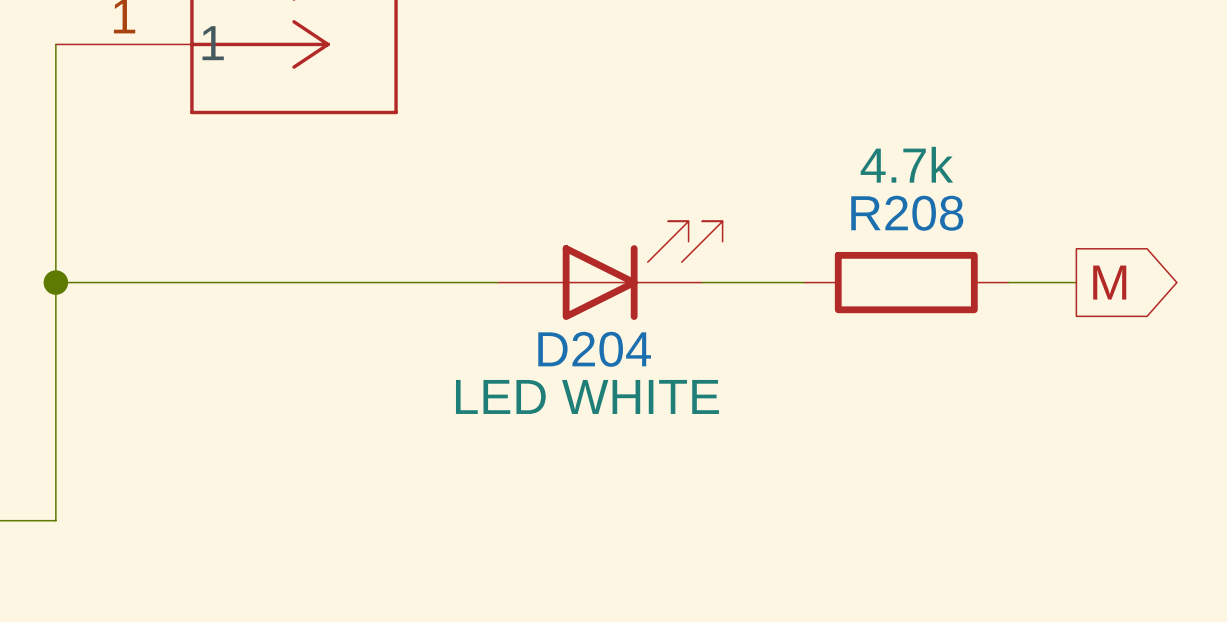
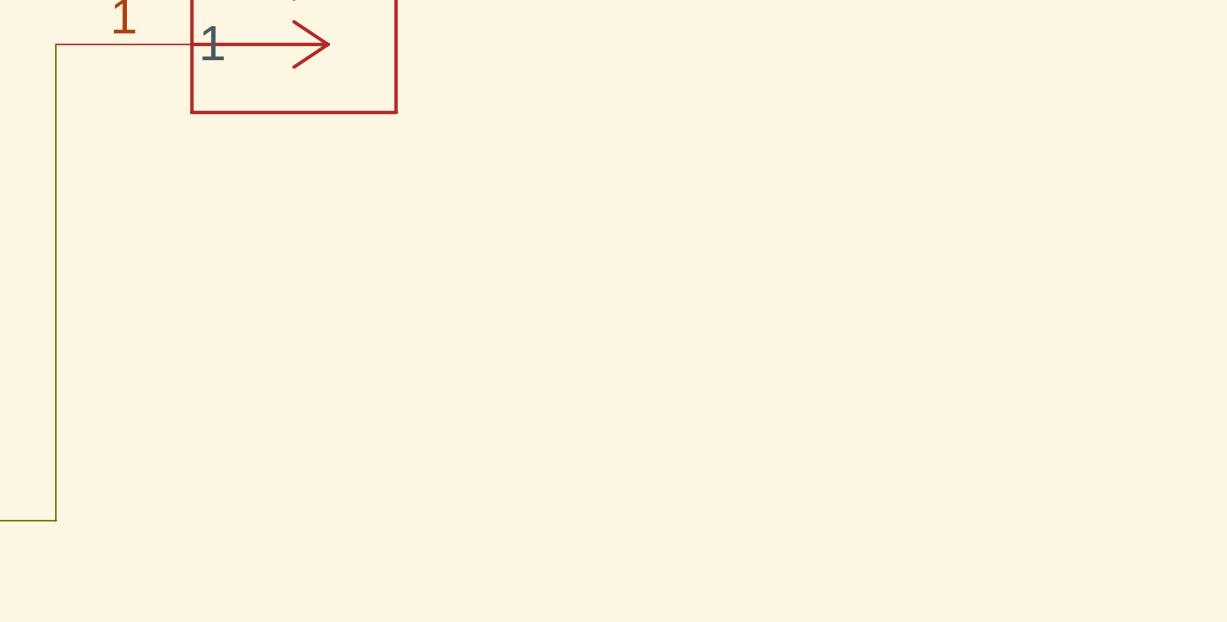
D204: LED WHITE (610, 270) -> none
wire: (55, 282) (498, 282) -> none
junction: (55, 282) -> none
wire: (702, 282) (804, 282) -> none
R208: 4.7k (906, 282) -> none
wire: (1008, 282) (1076, 282) -> none
global label: M (1109, 282) -> none

